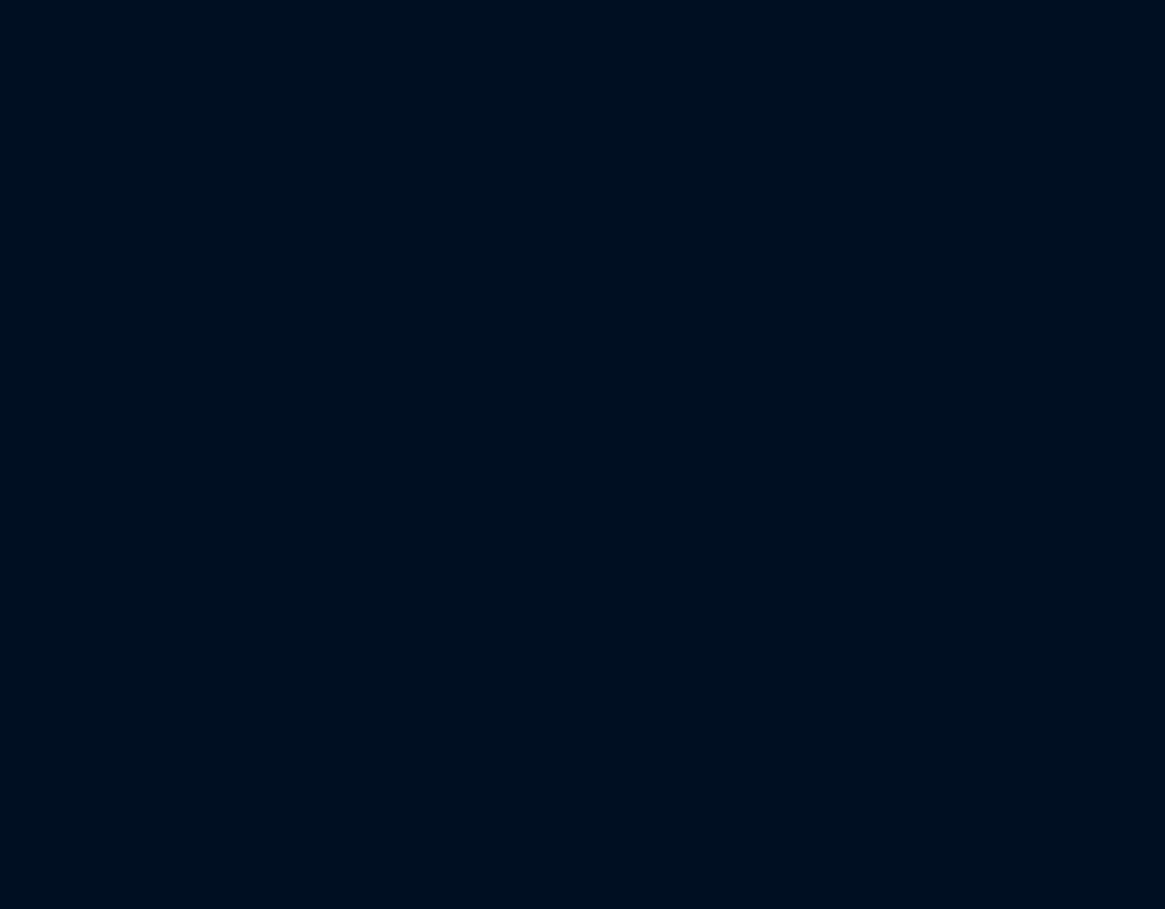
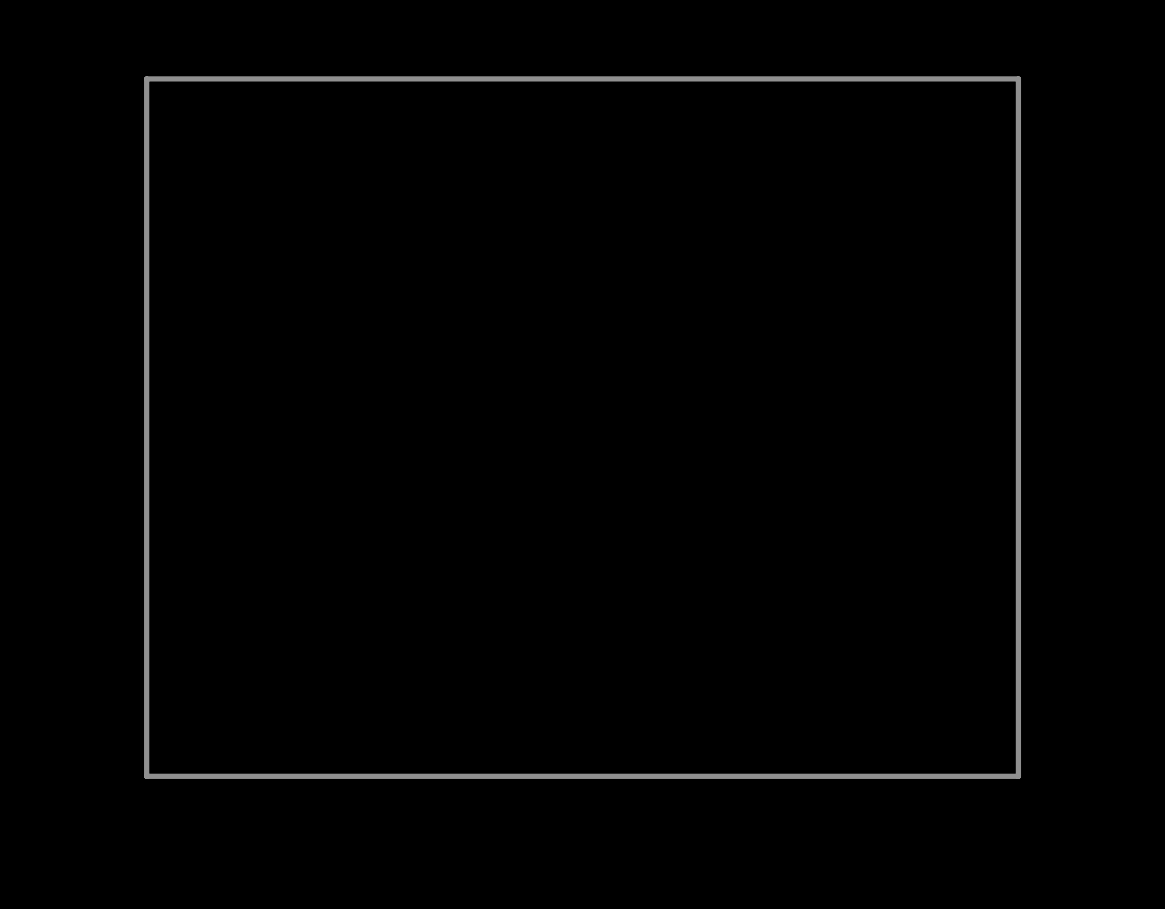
line: none -> (146, 78) (1018, 78) (1018, 776) (146, 776) (146, 78)

